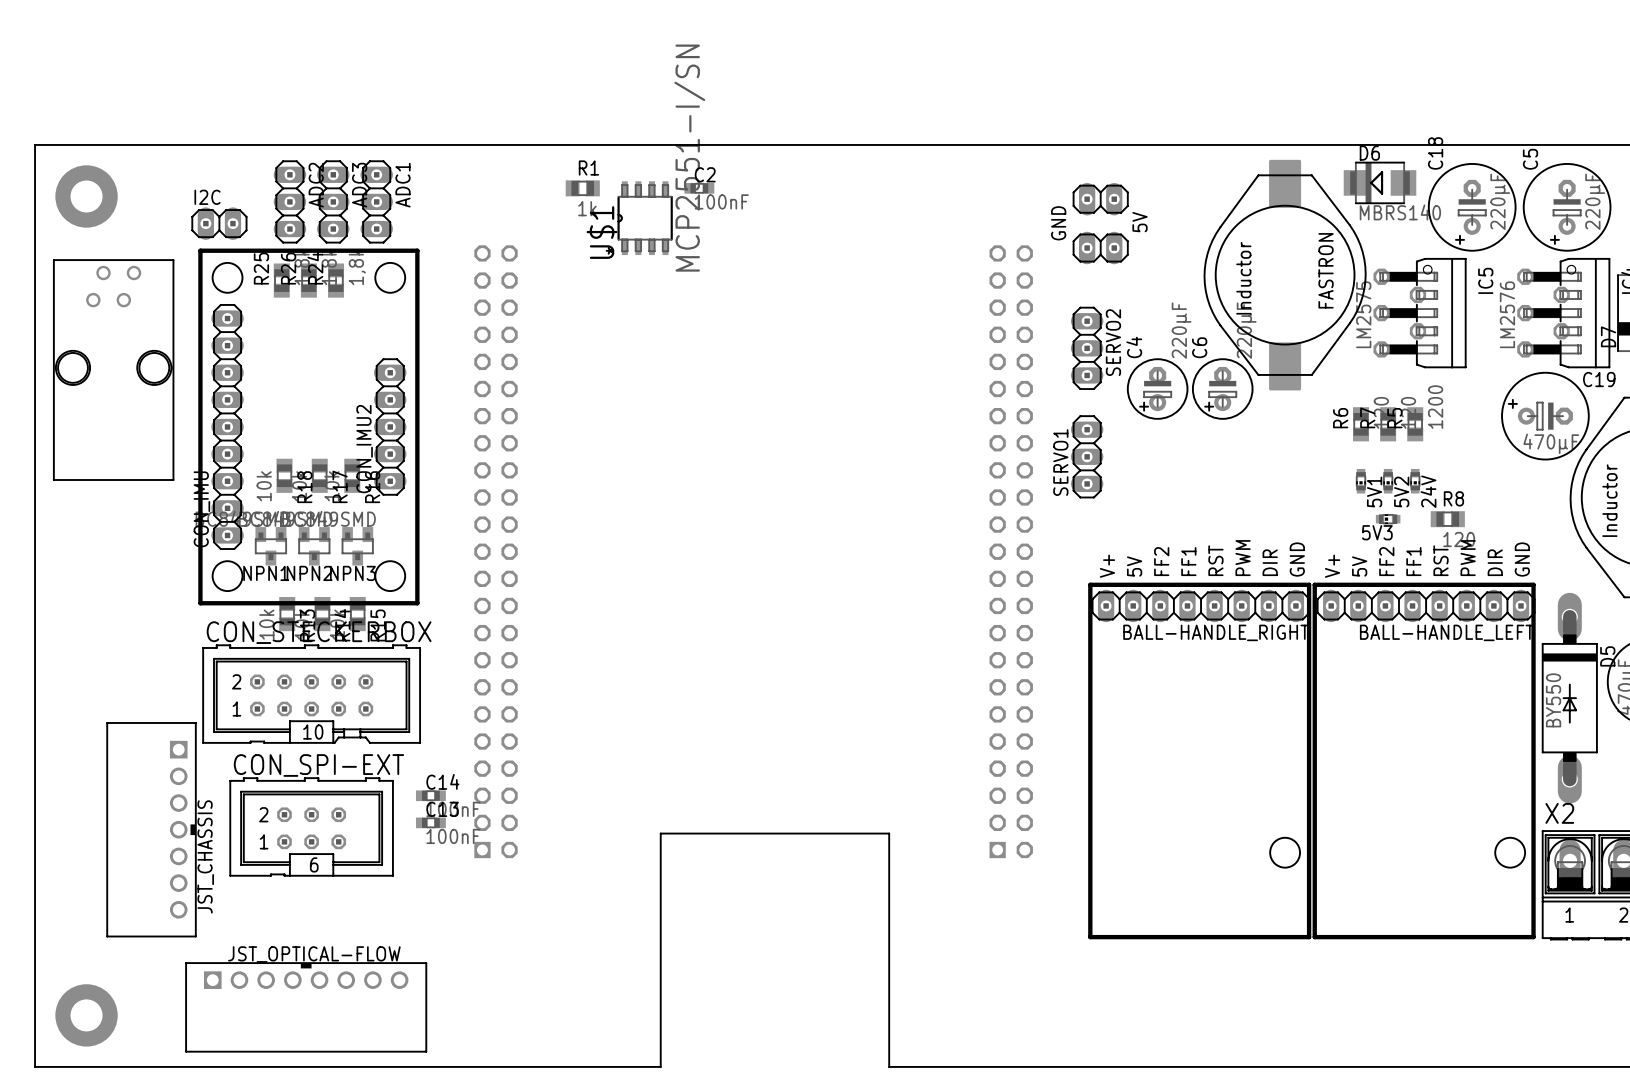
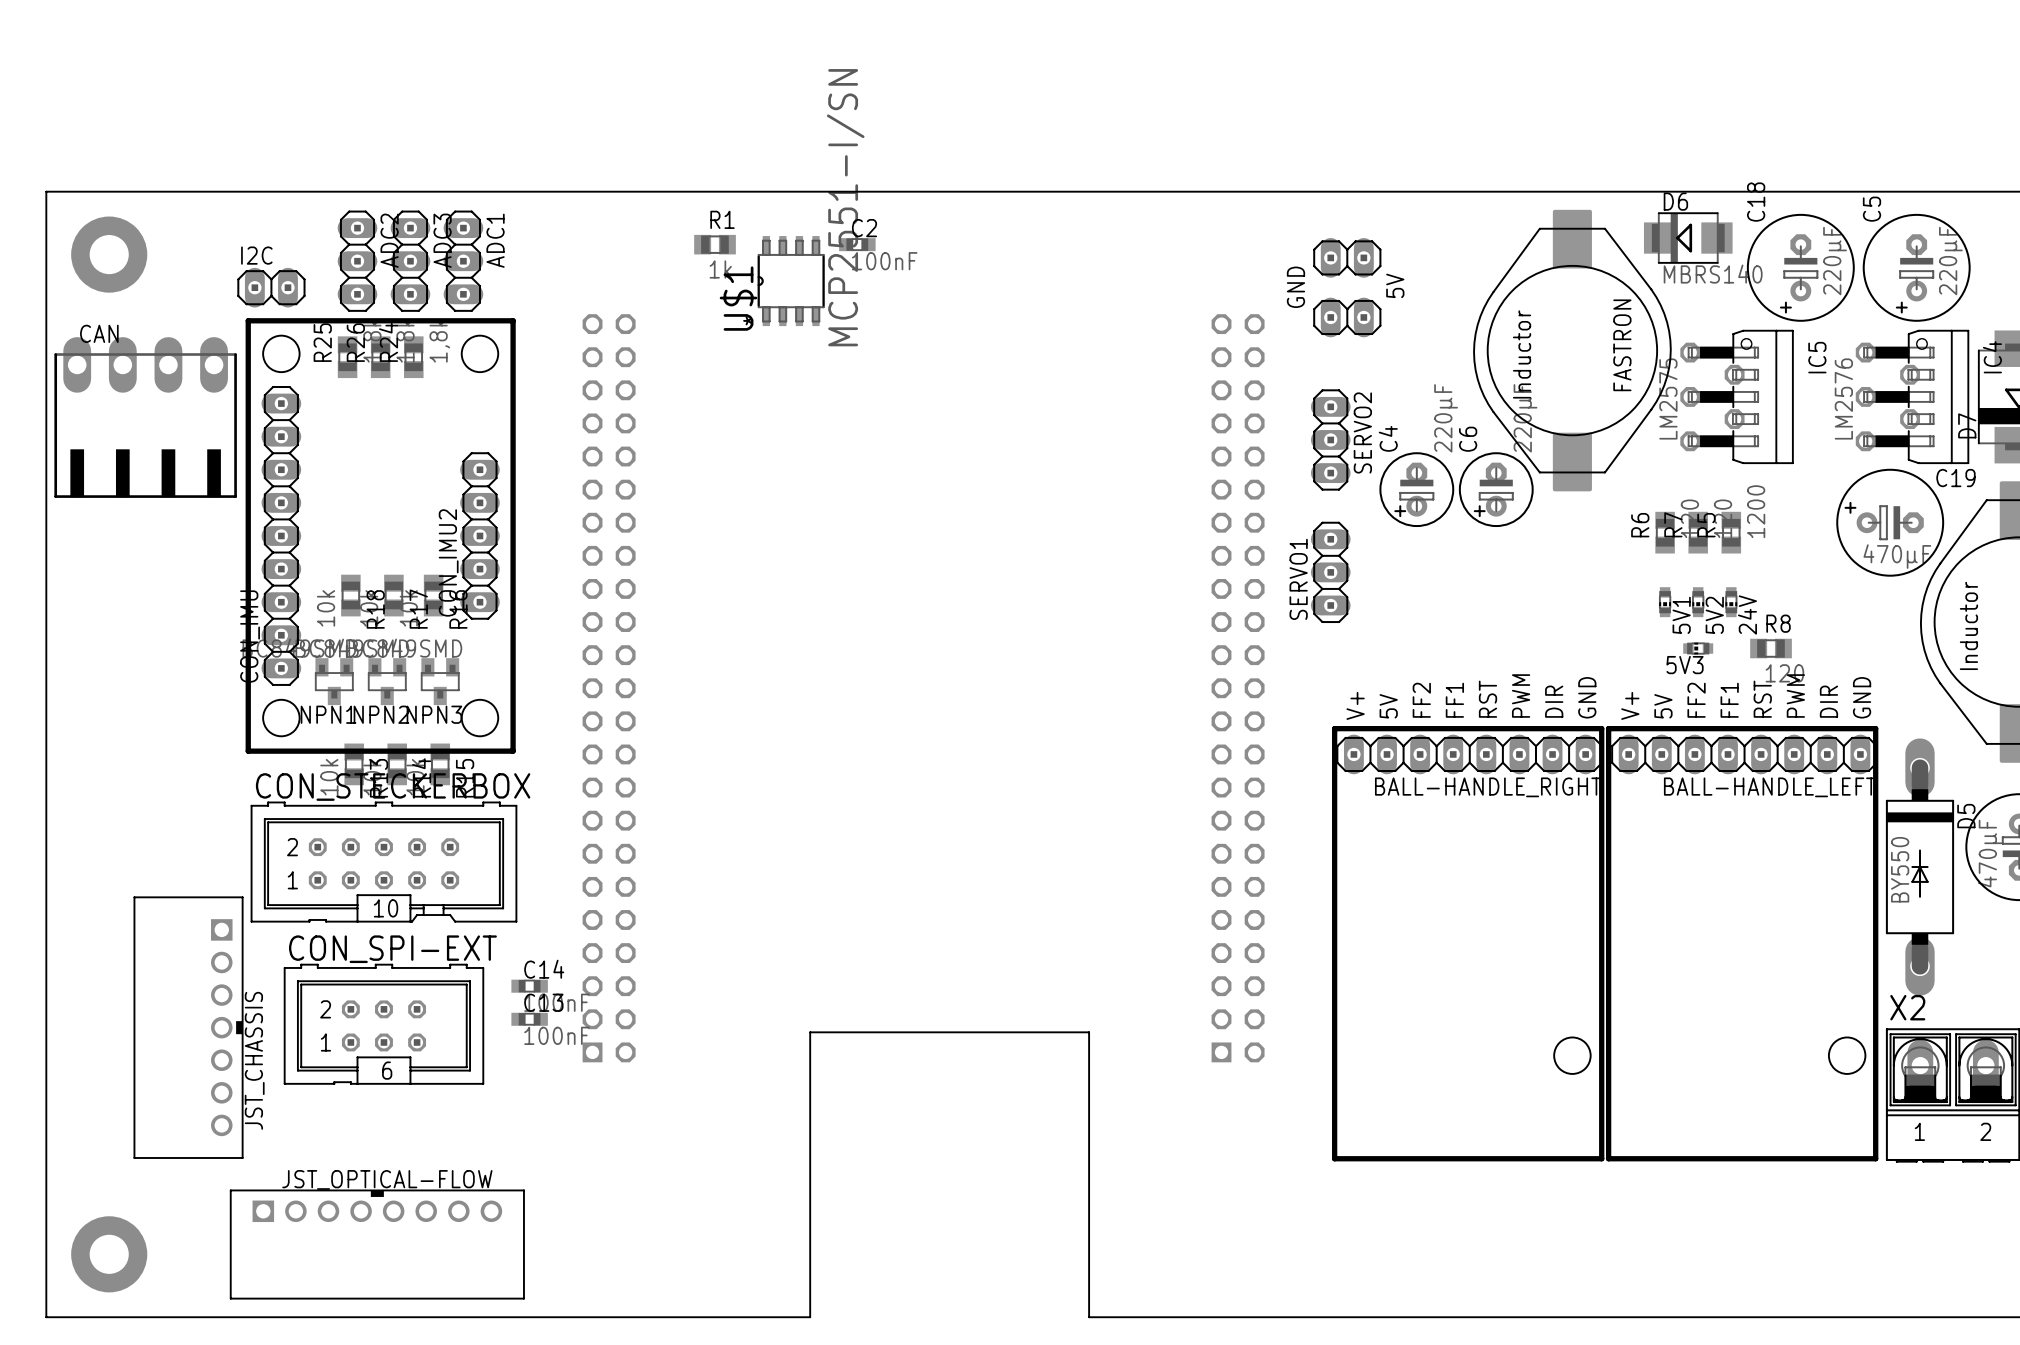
CAN: none -> (145, 417)
part: (113, 370) -> none

